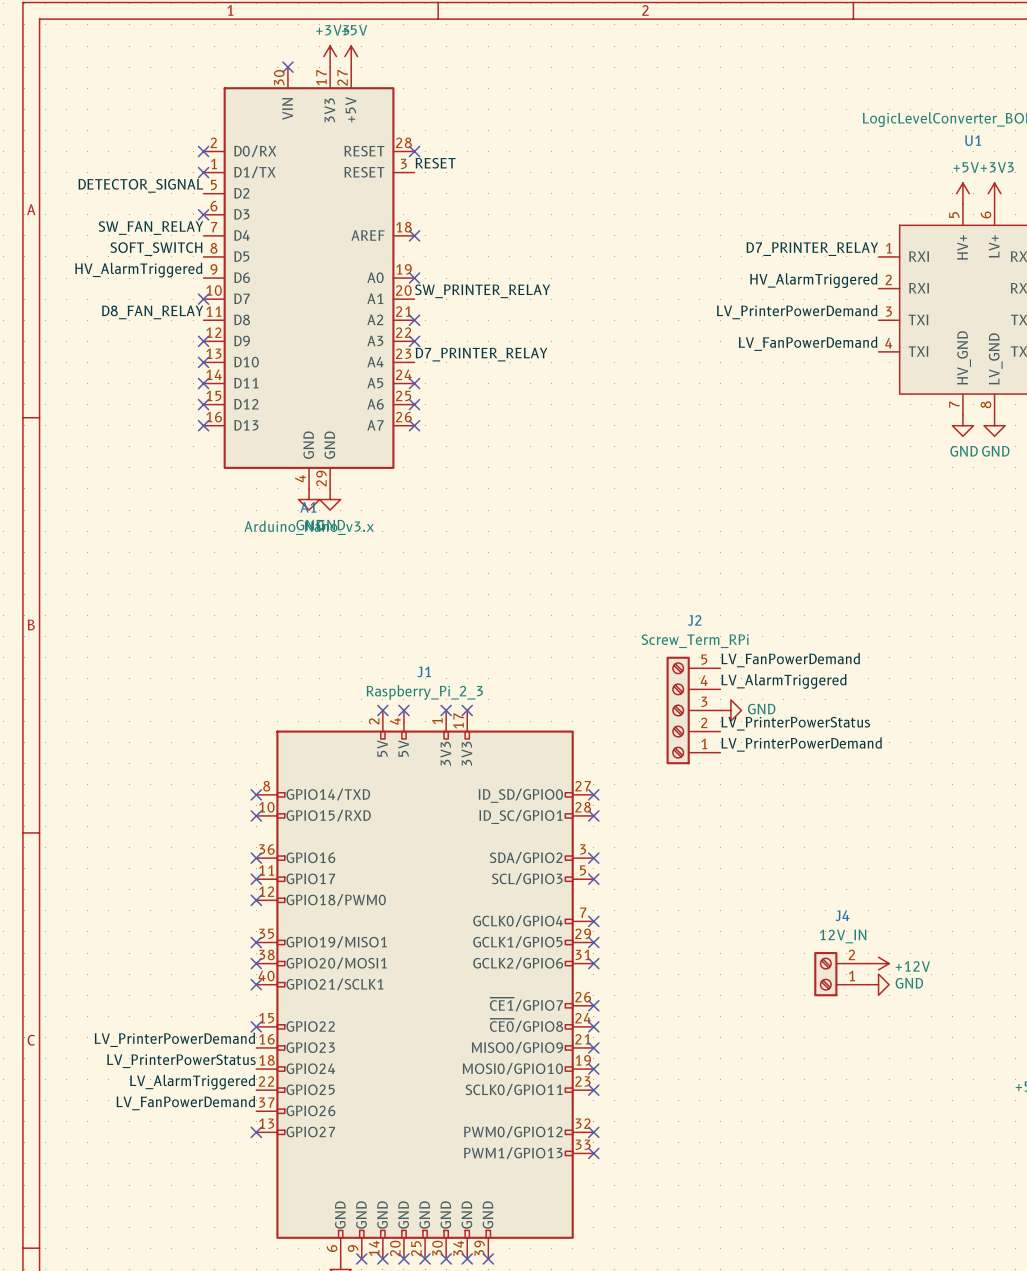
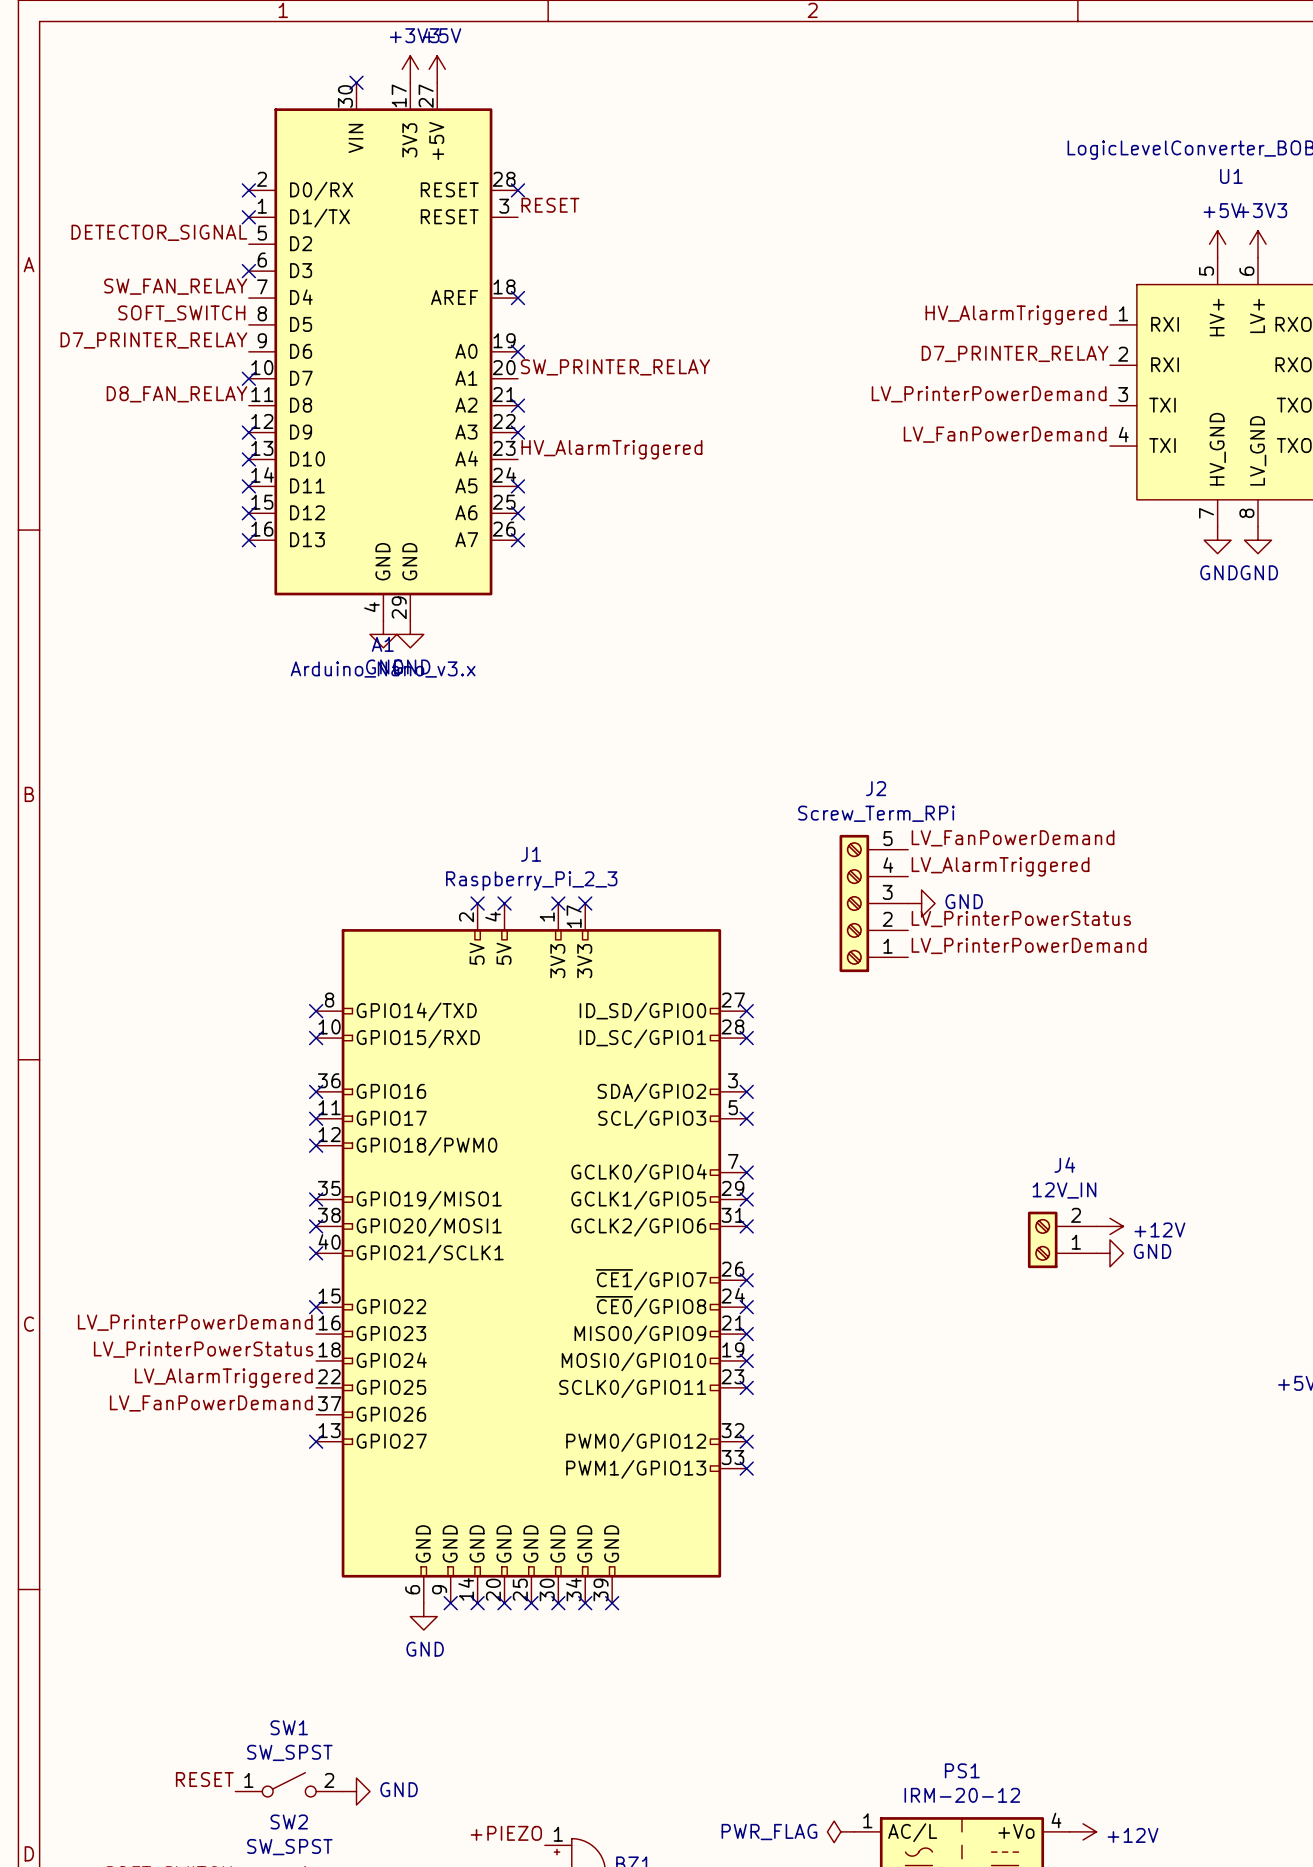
label: D7_PRINTER_RELAY (812, 249) -> HV_AlarmTriggered (1016, 315)
label: HV_AlarmTriggered (138, 270) -> D7_PRINTER_RELAY (153, 340)
label: HV_AlarmTriggered (813, 280) -> D7_PRINTER_RELAY (1015, 353)
label: D7_PRINTER_RELAY (481, 354) -> HV_AlarmTriggered (611, 449)

